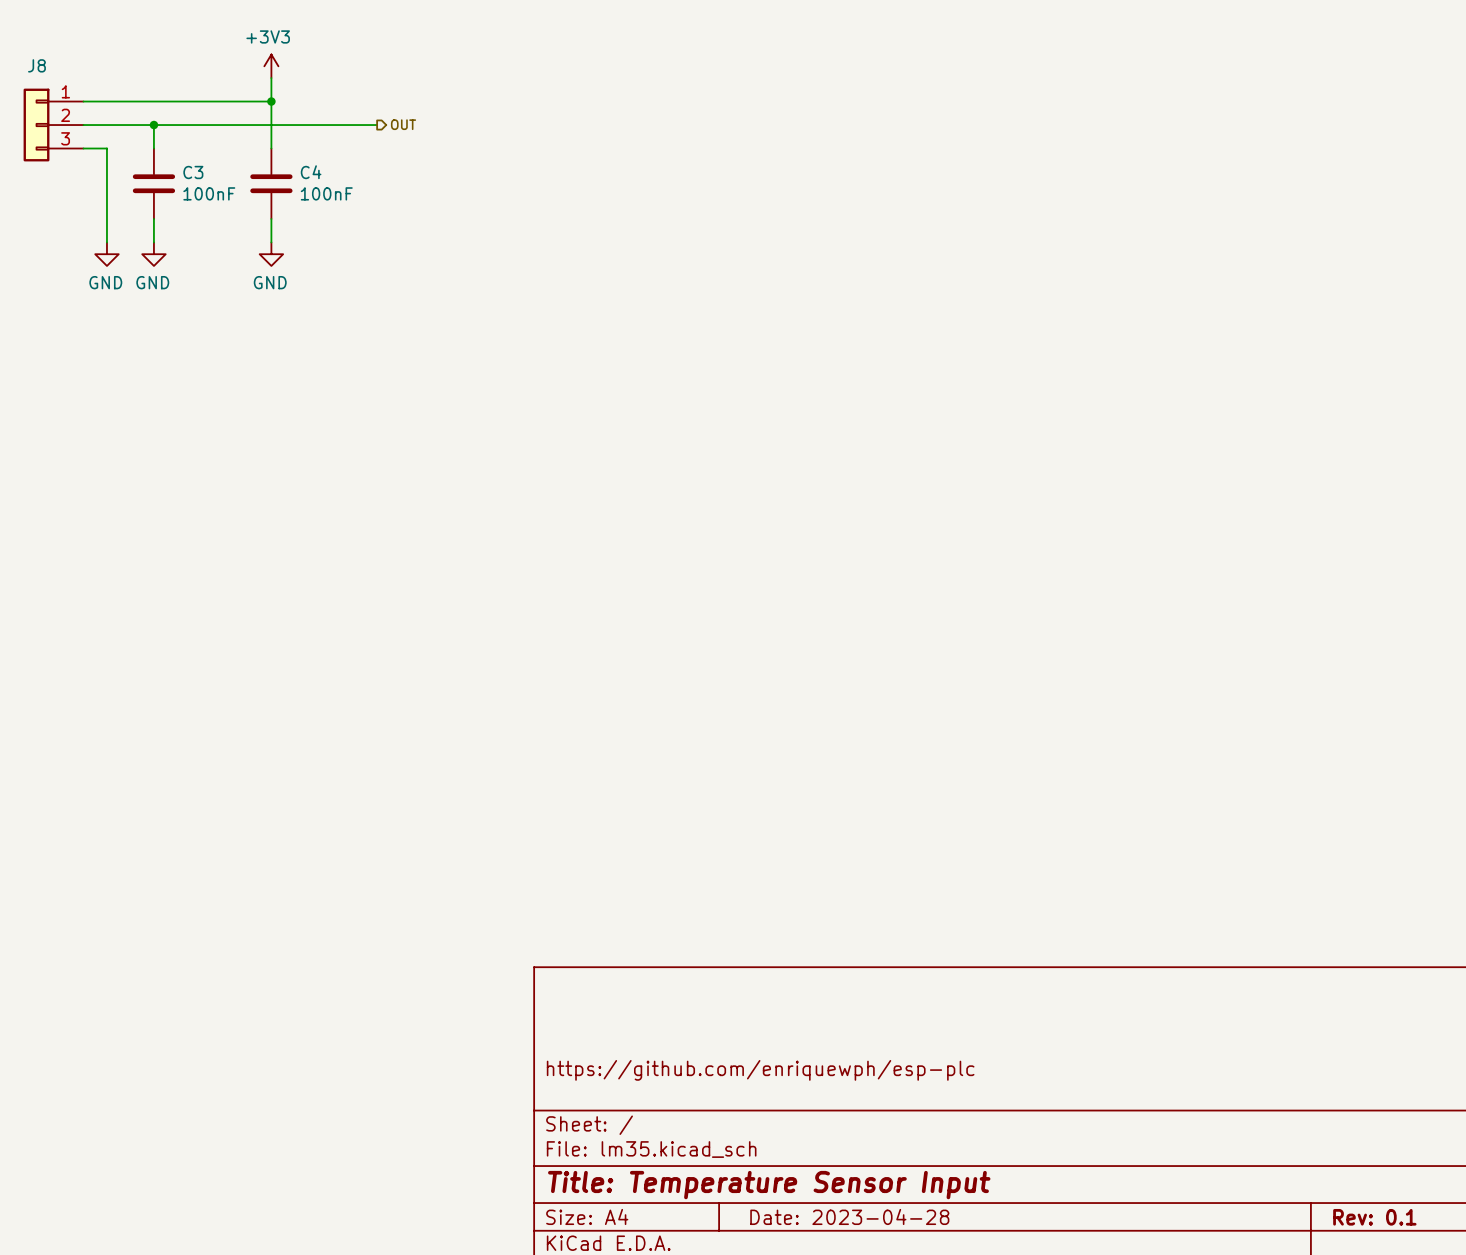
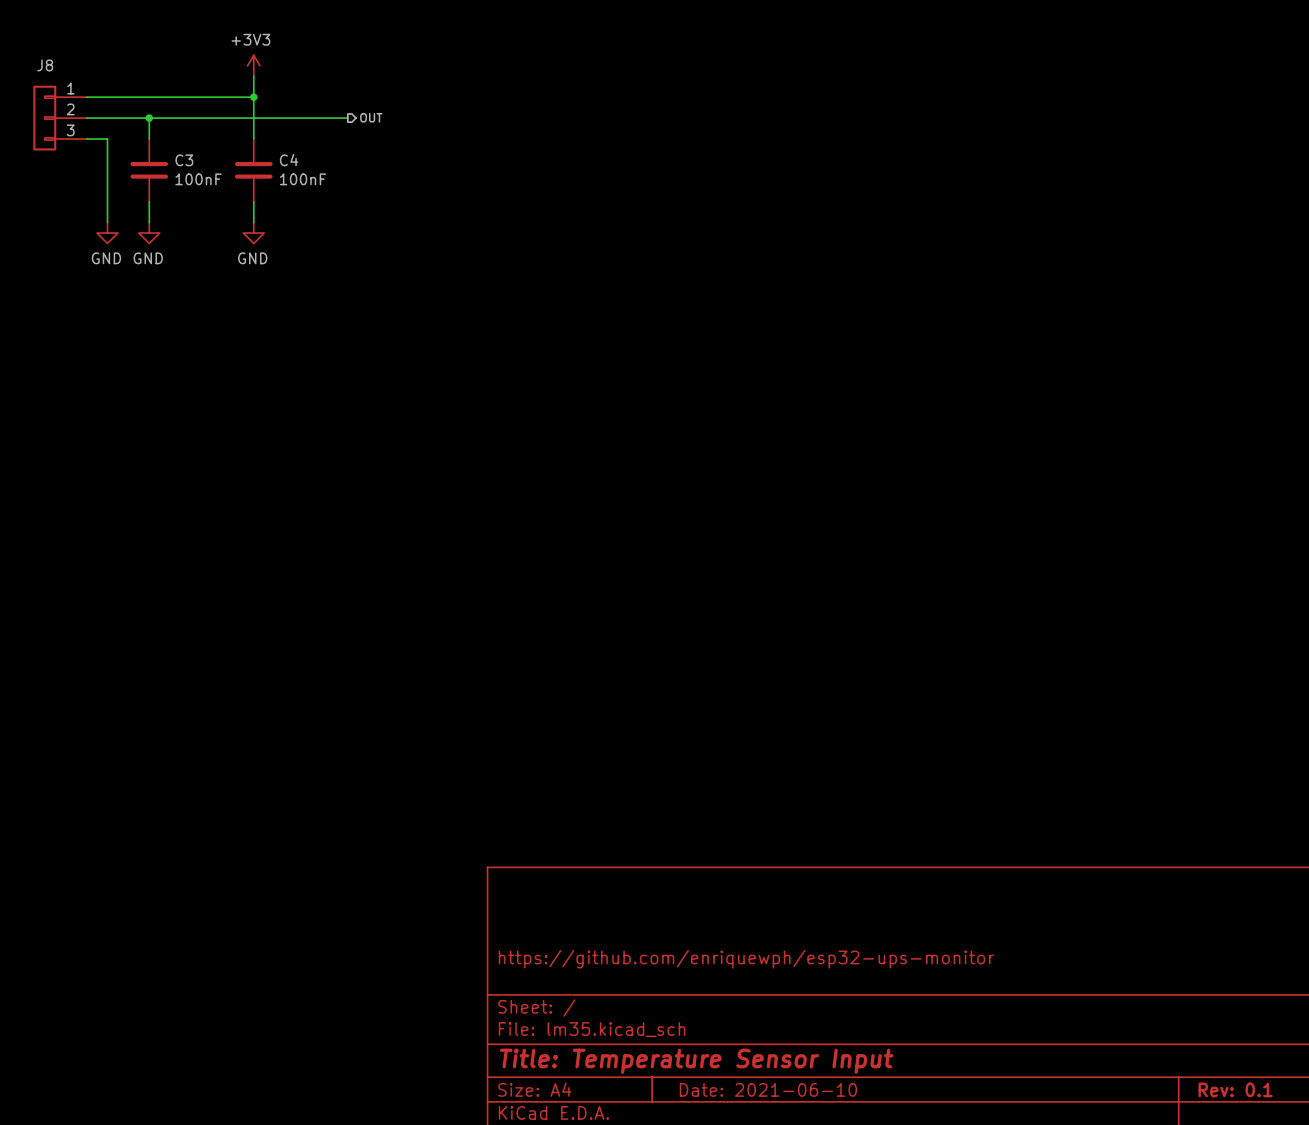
title block: https://github.com/enriquewph/esp-plc (760, 1070) -> https://github.com/enriquewph/esp32-ups-monitor (746, 959)
title block: Date: 2023-04-28 (849, 1216) -> Date: 2021-06-10 (768, 1089)

